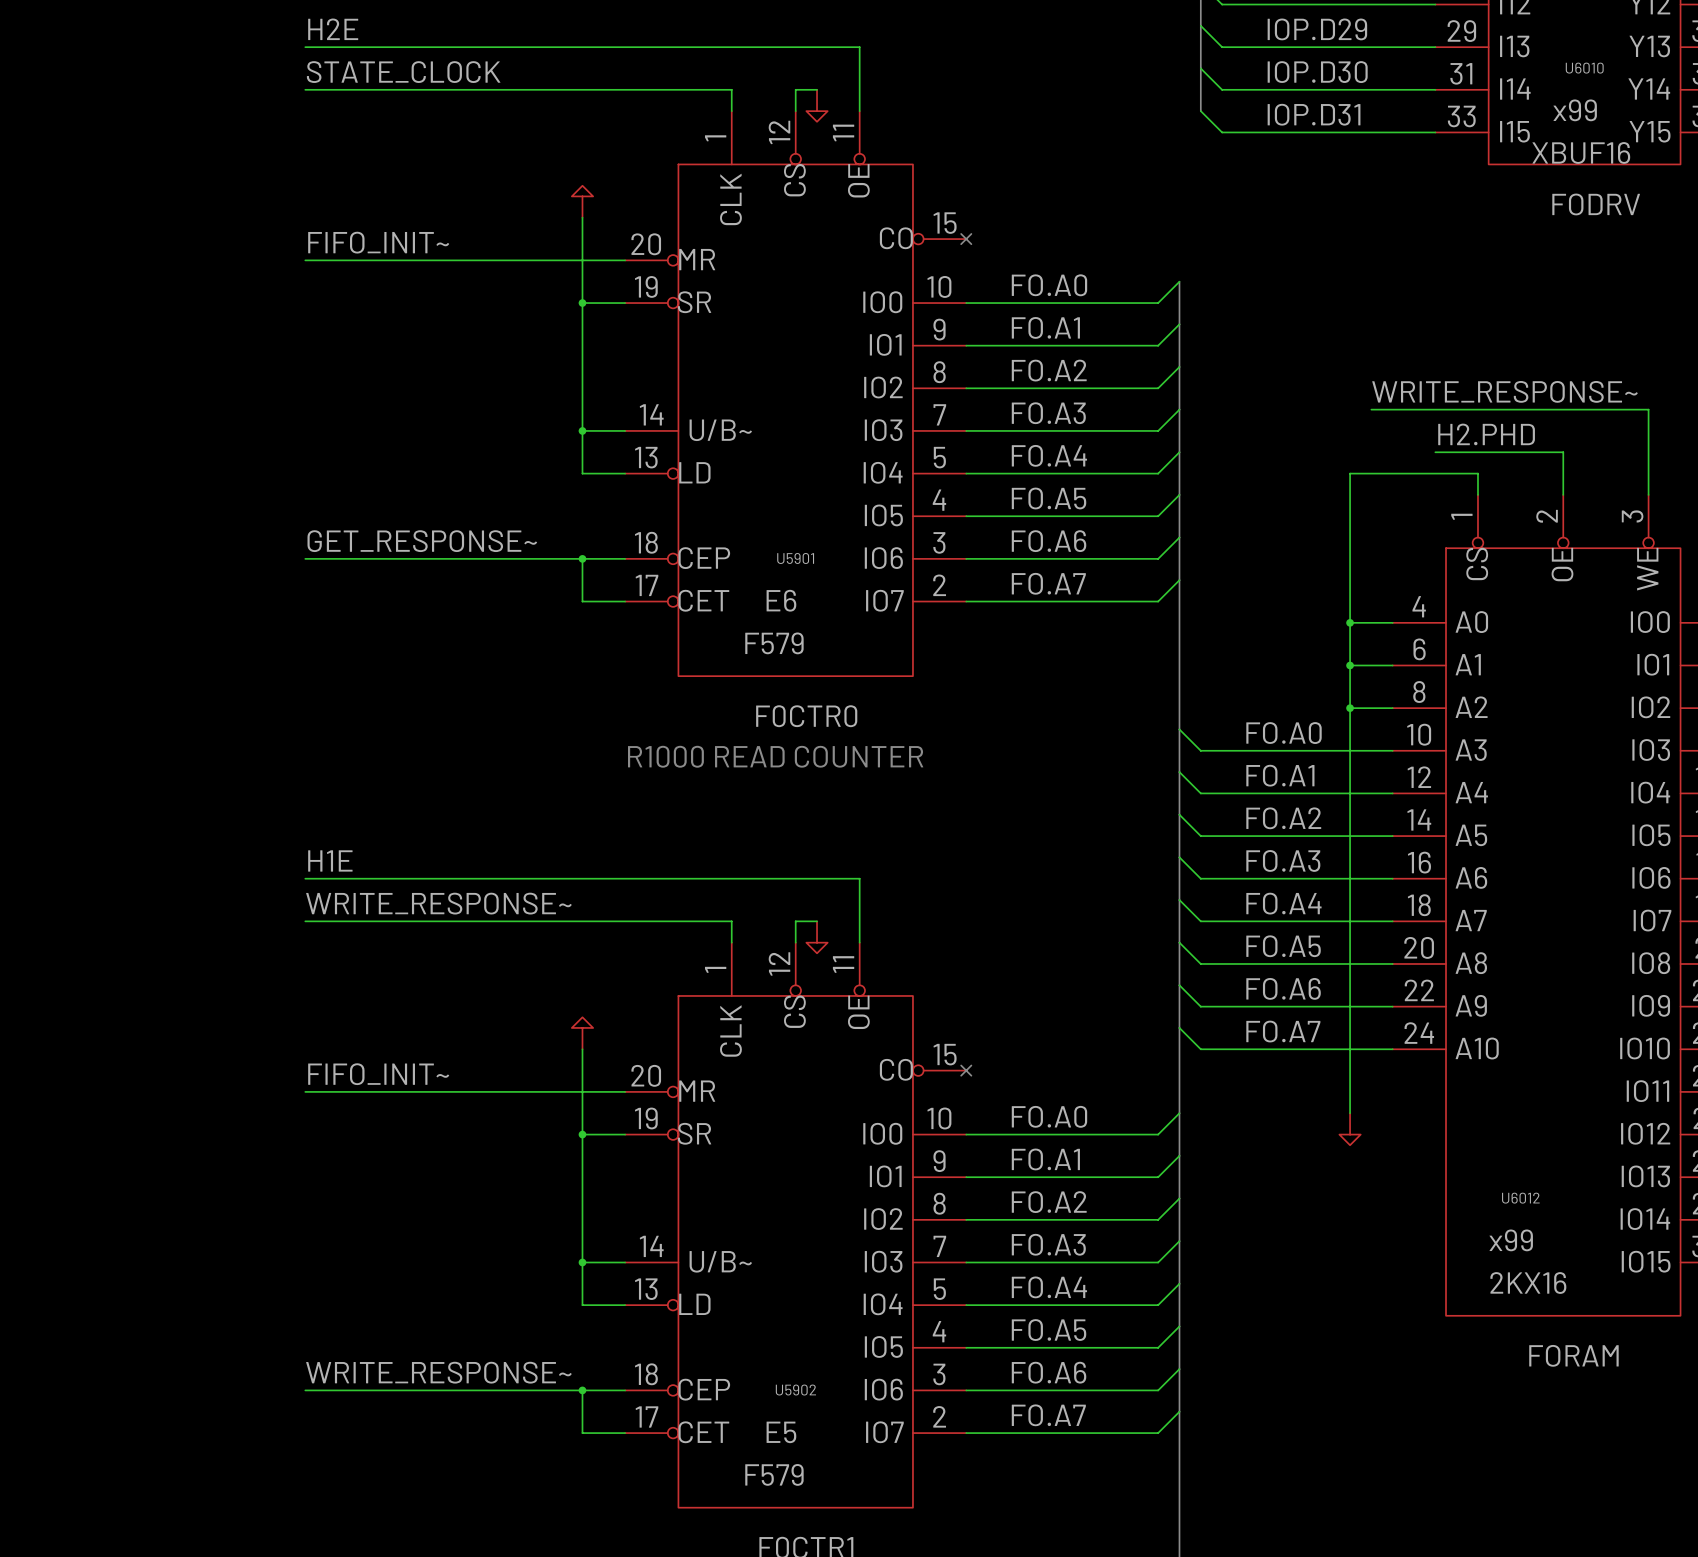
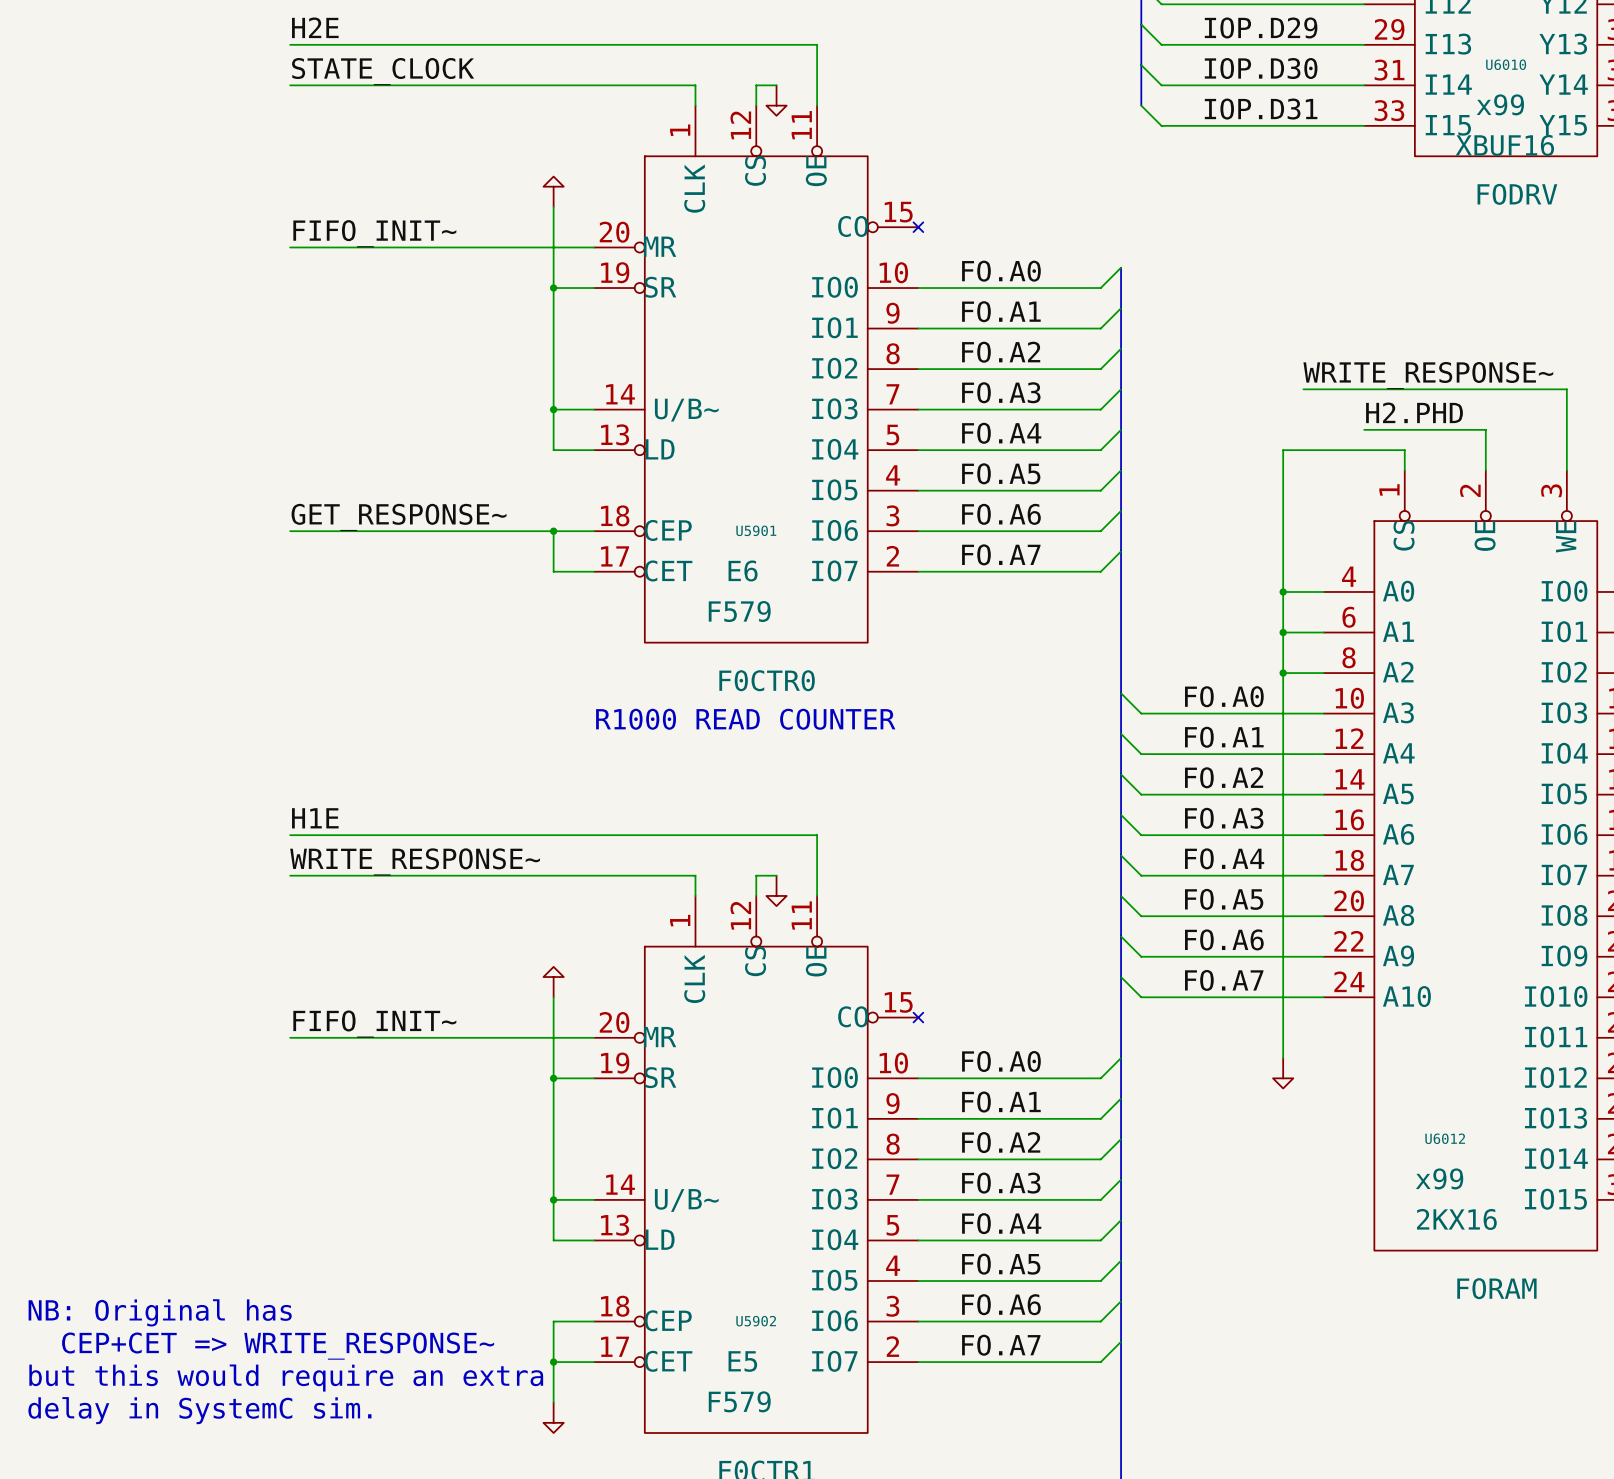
label: WRITE_RESPONSE~ (438, 1372) -> none
text: none -> NB: Original has (160, 1312)
wire: (305, 1390) (582, 1390) -> none
junction position: (582, 1390) -> (553, 1362)
text: none -> CEP+CET => WRITE_RESPONSE~ (278, 1346)
wire: none -> (553, 1362) (553, 1402)
text: none -> but this would require an extra (286, 1378)
text: none -> delay in SystemC sim. (199, 1410)
power symbol: none -> (553, 1418)

